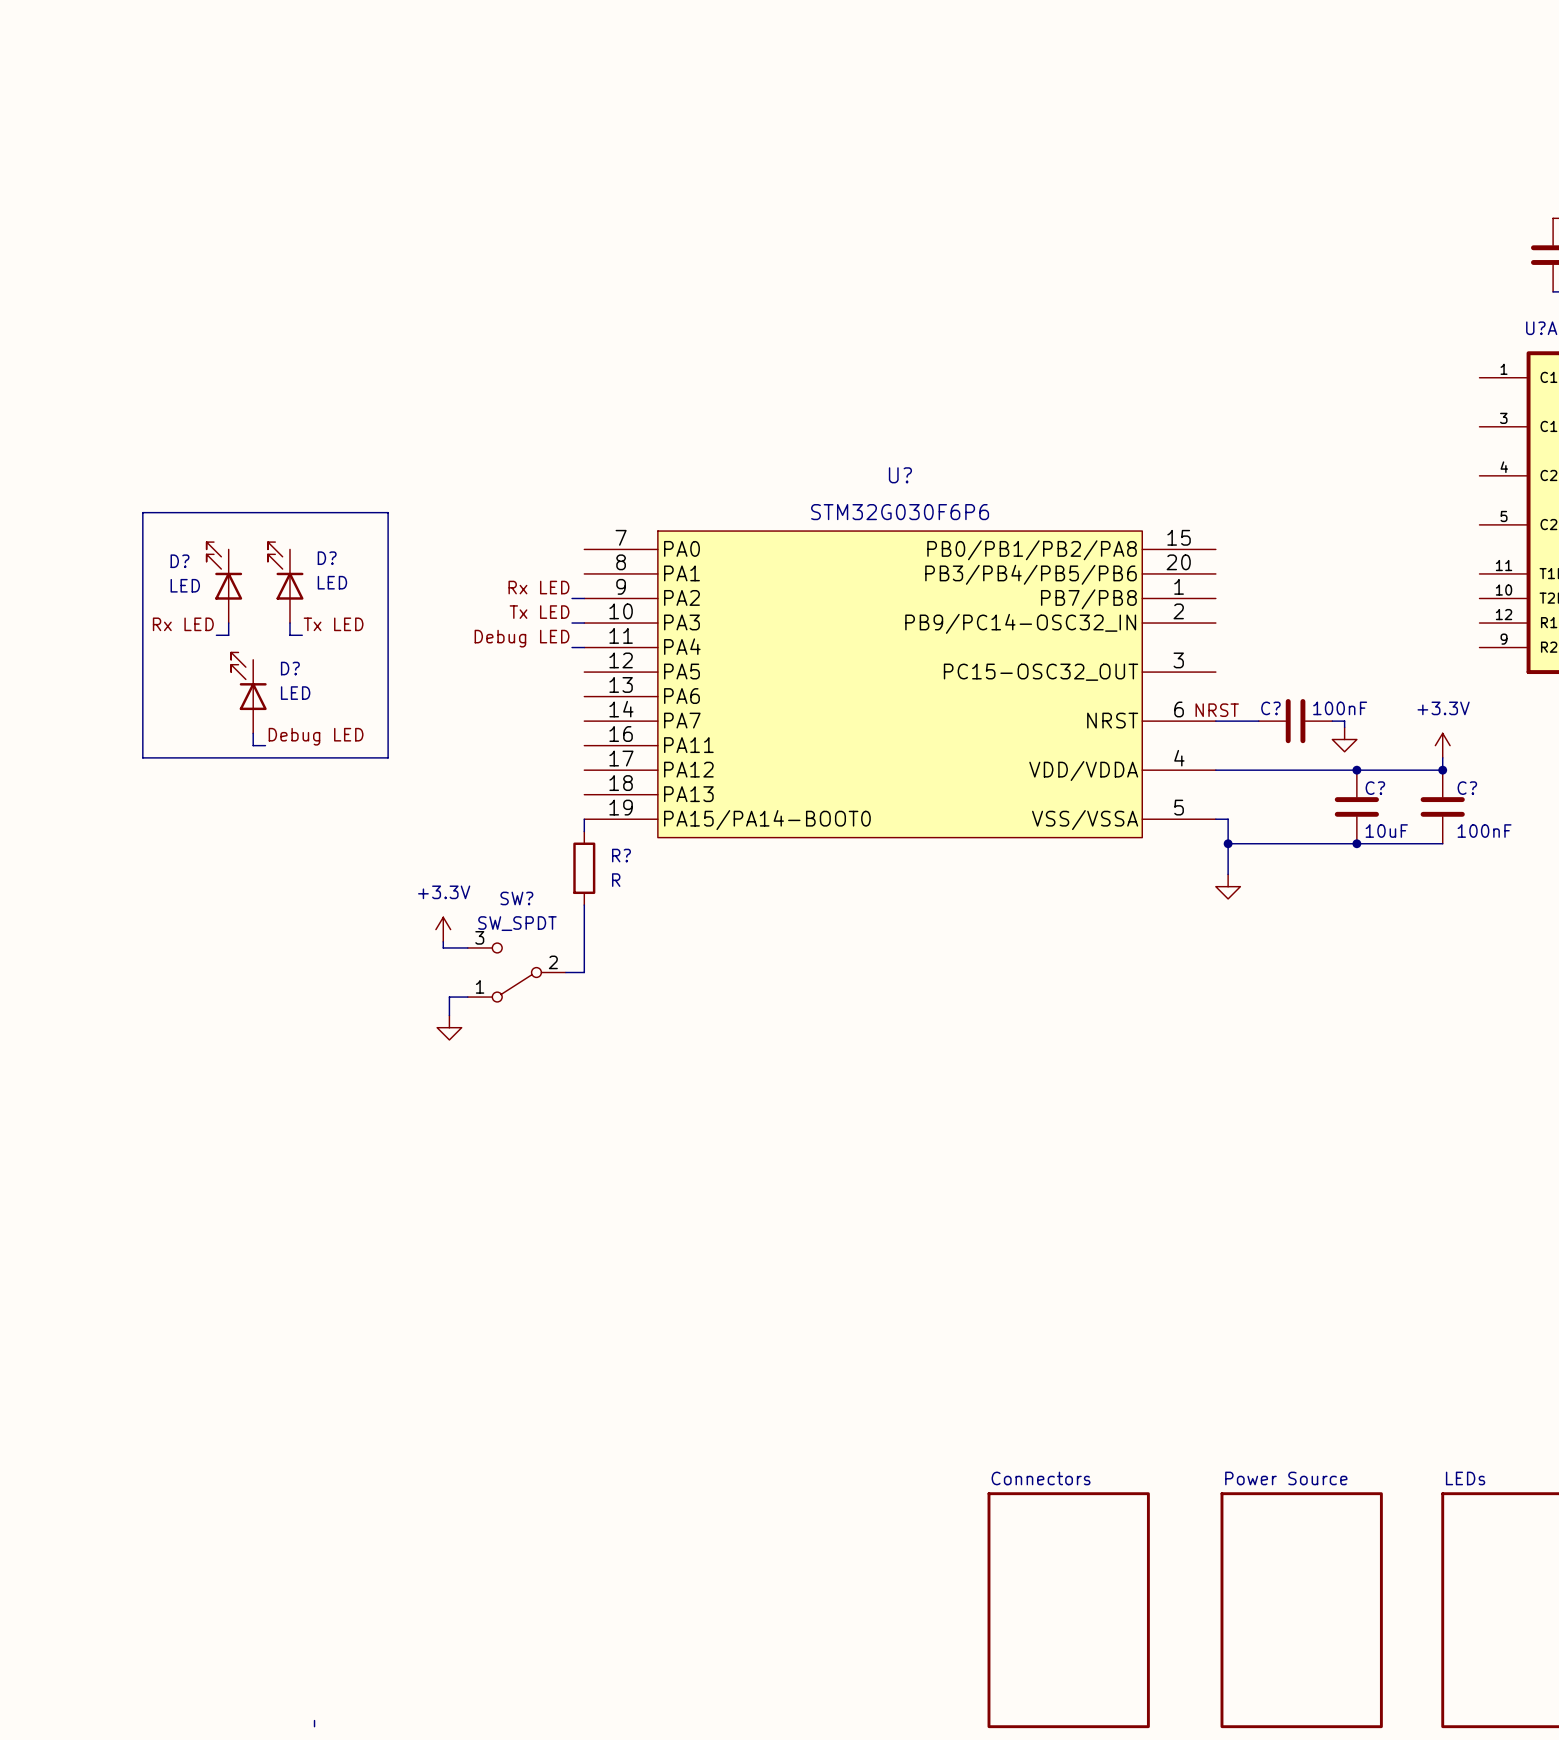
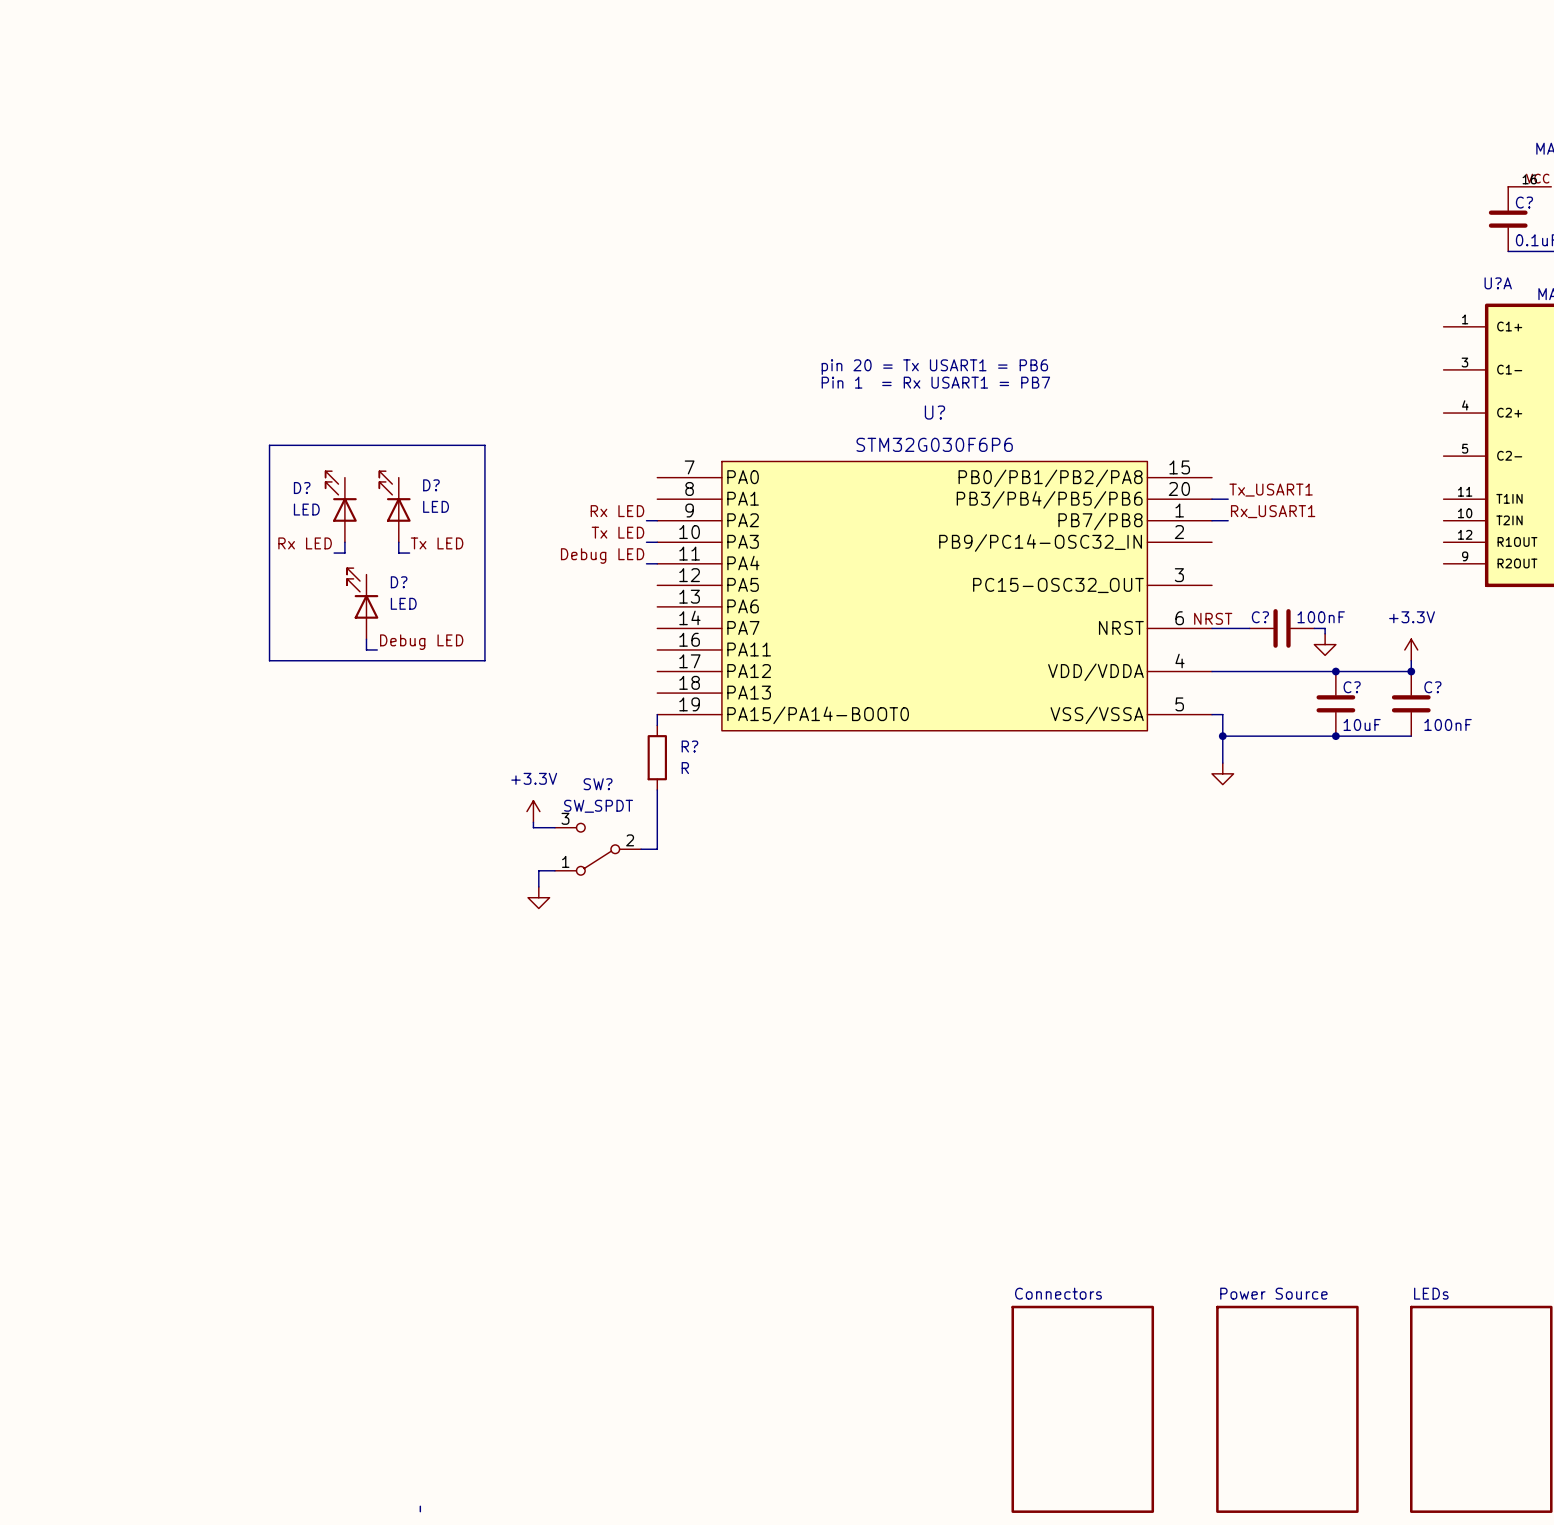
text: none -> pin 20 = Tx USART1 = PB6 (934, 367)
text: none -> Pin 1 = Rx USART1 = PB7 (935, 382)
label: none -> Tx_USART1 (1271, 490)
wire: none -> (1212, 499) (1228, 499)
label: none -> Rx_USART1 (1273, 511)
wire: none -> (1212, 520) (1228, 520)

